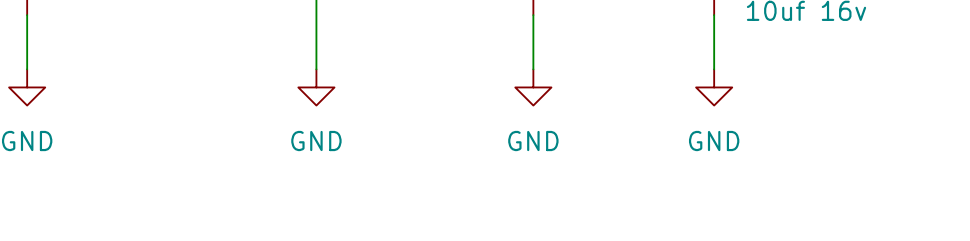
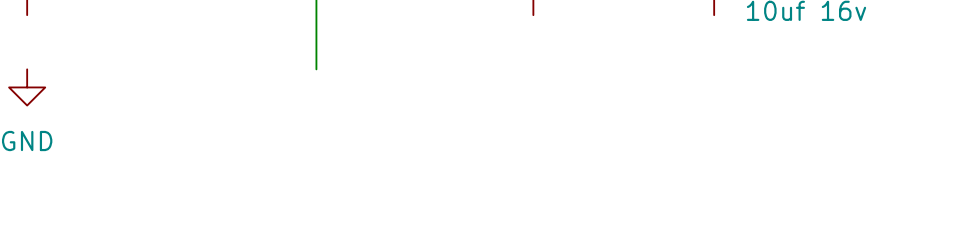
wire: (27, 15) (27, 69) -> none
wire: (533, 15) (533, 69) -> none
wire: (714, 15) (714, 69) -> none
power symbol: GND (316, 87) -> none
power symbol: GND (533, 87) -> none
power symbol: GND (714, 87) -> none

